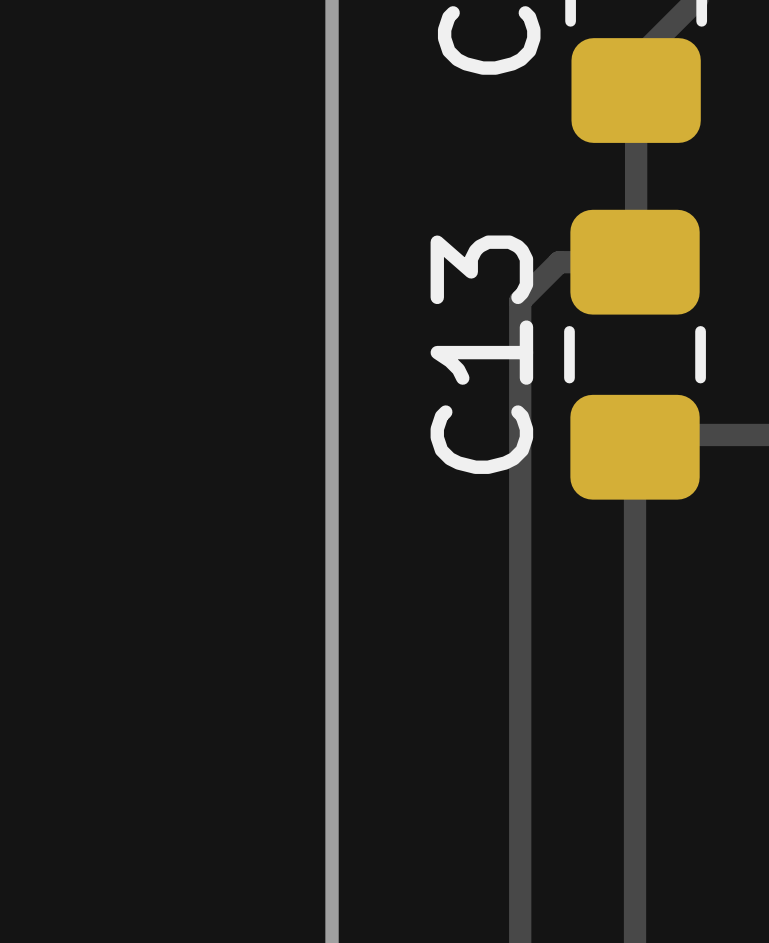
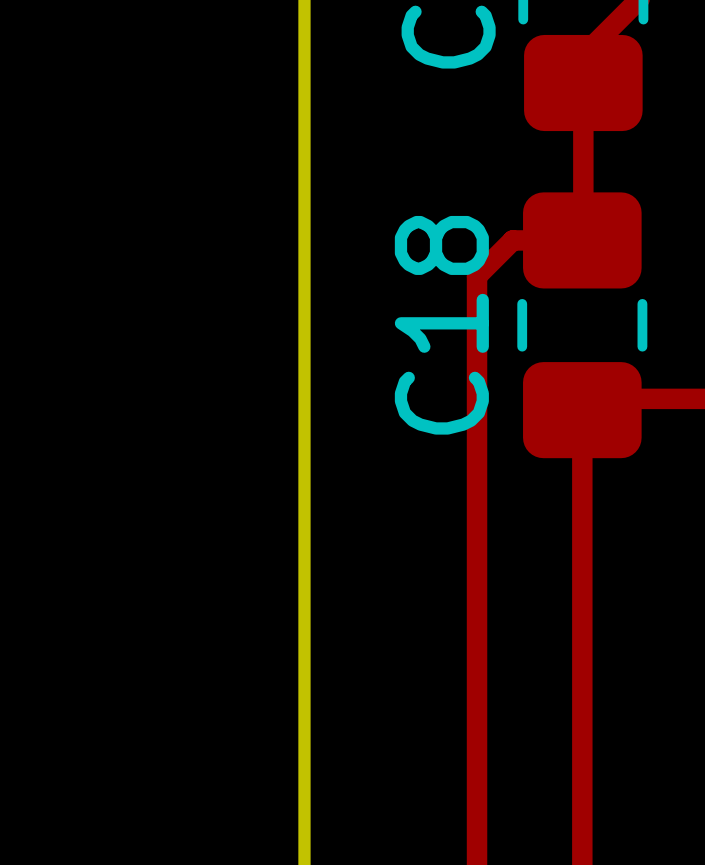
C13 name: C13 (481, 354) -> C18 (441, 325)

